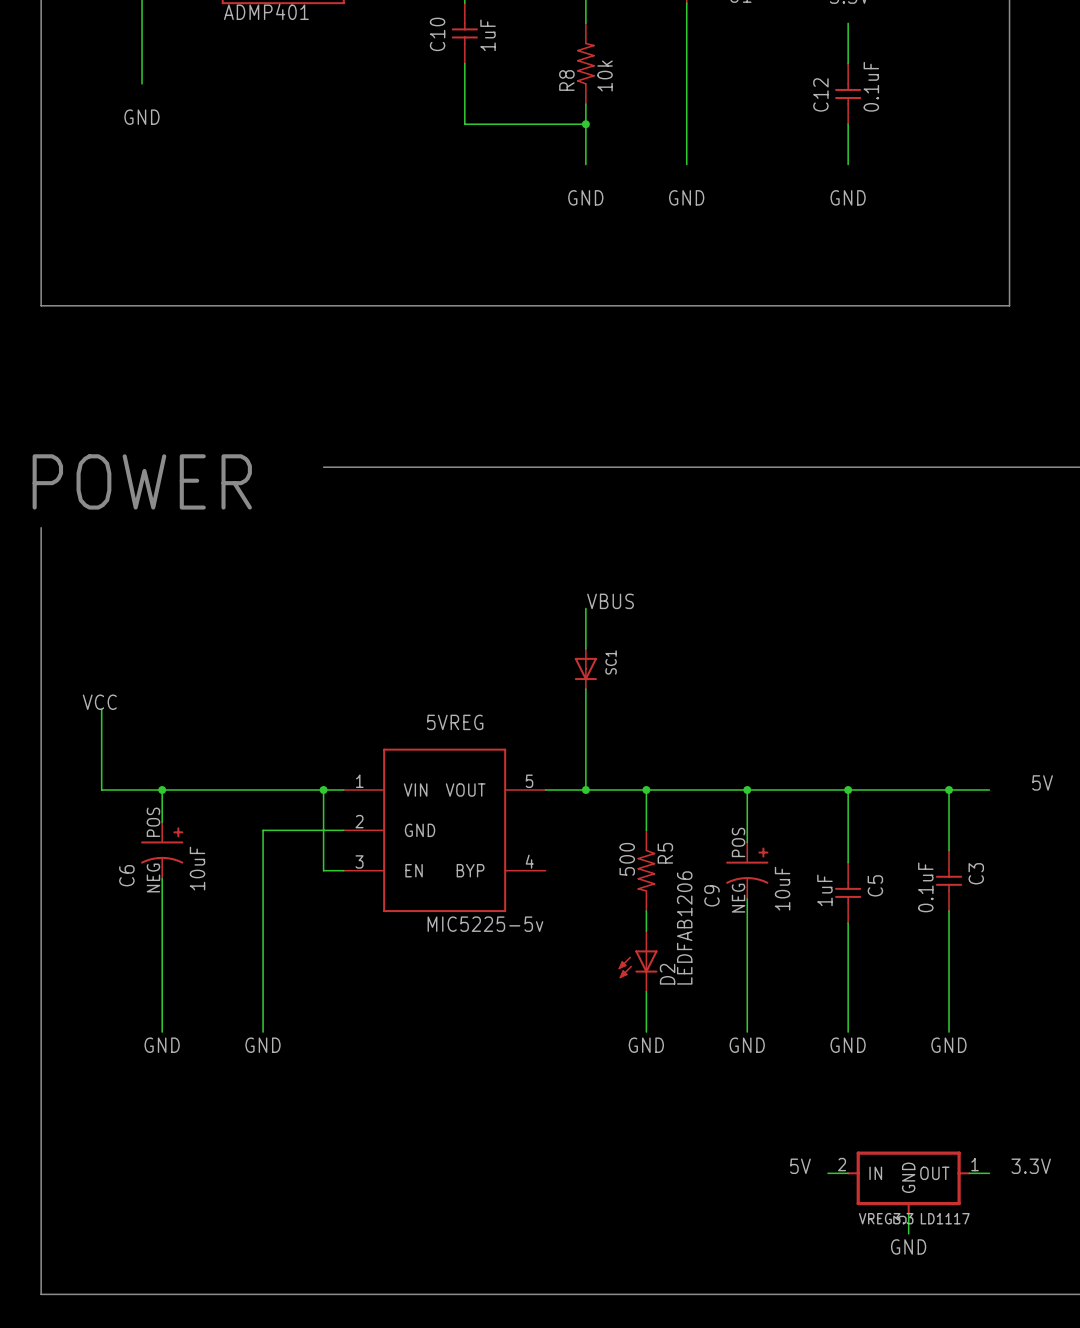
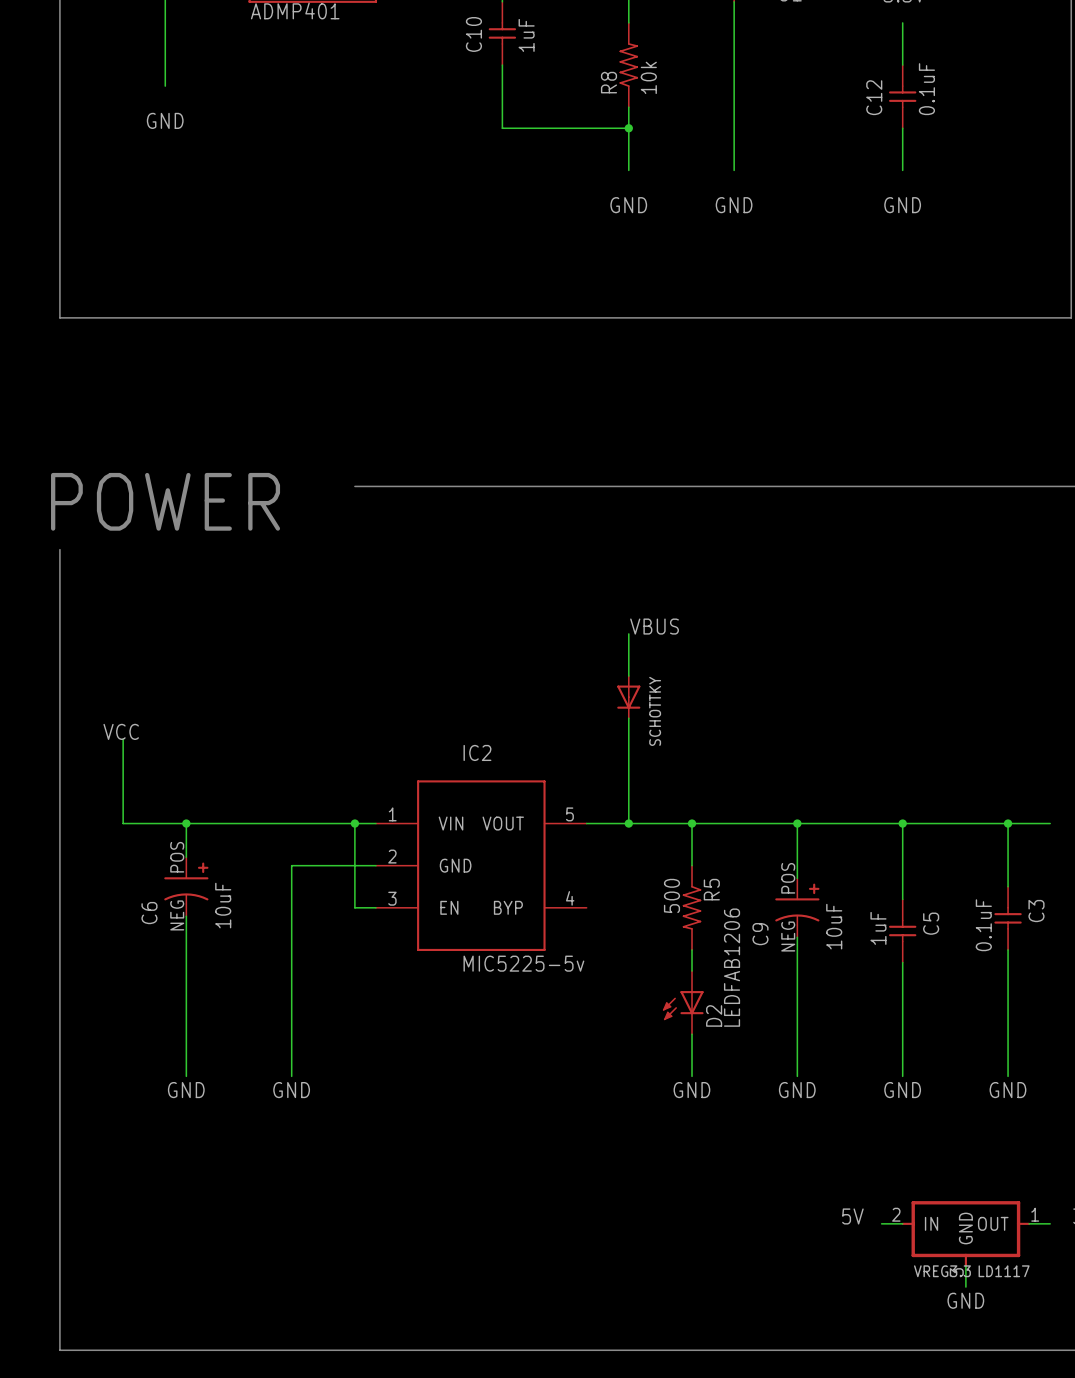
SC1 name: SC1 (611, 662) -> SCHOTTKY (655, 711)
5VREG name: 5VREG (455, 722) -> IC2 (477, 752)

